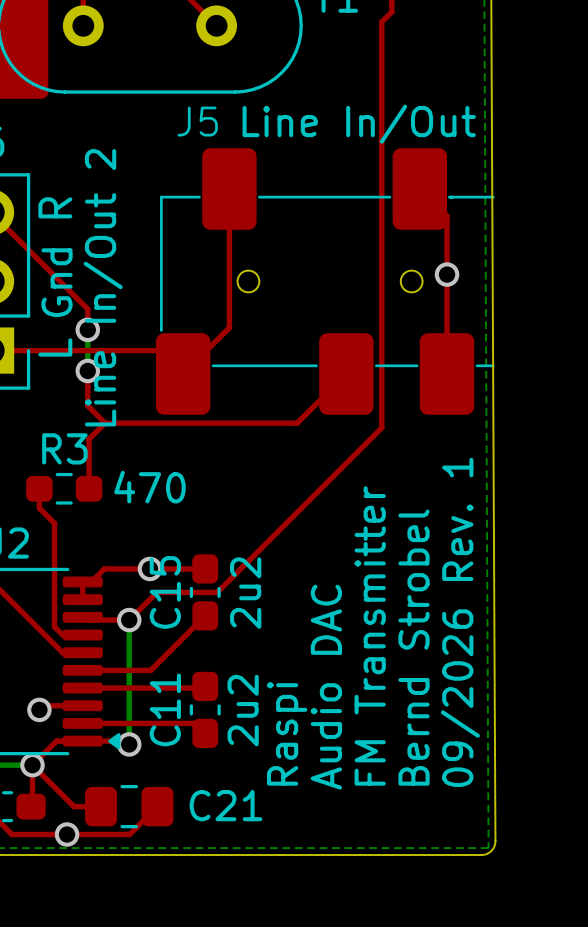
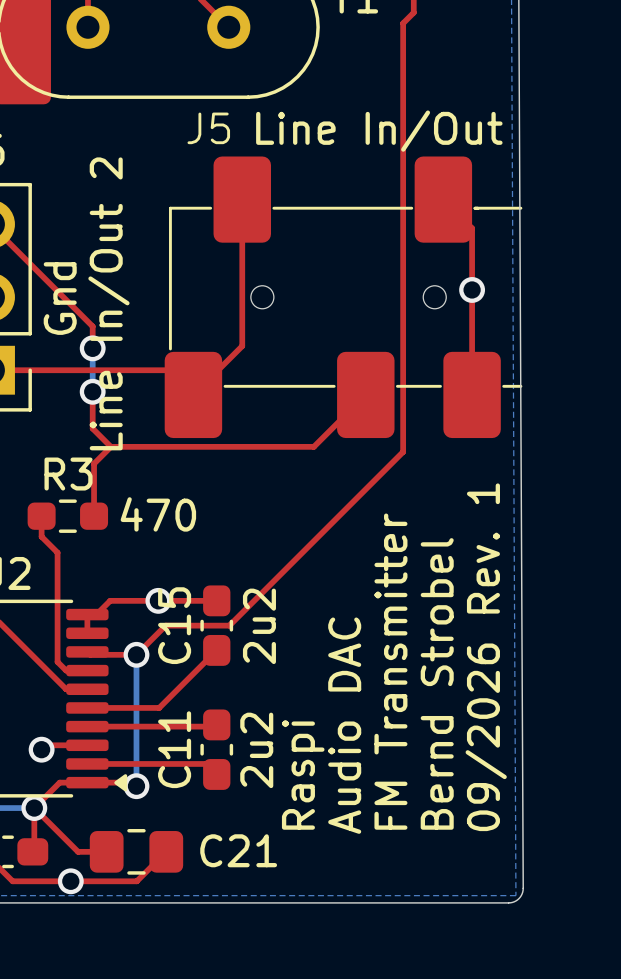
text: R (55, 207) -> none
text: L (55, 347) -> none

